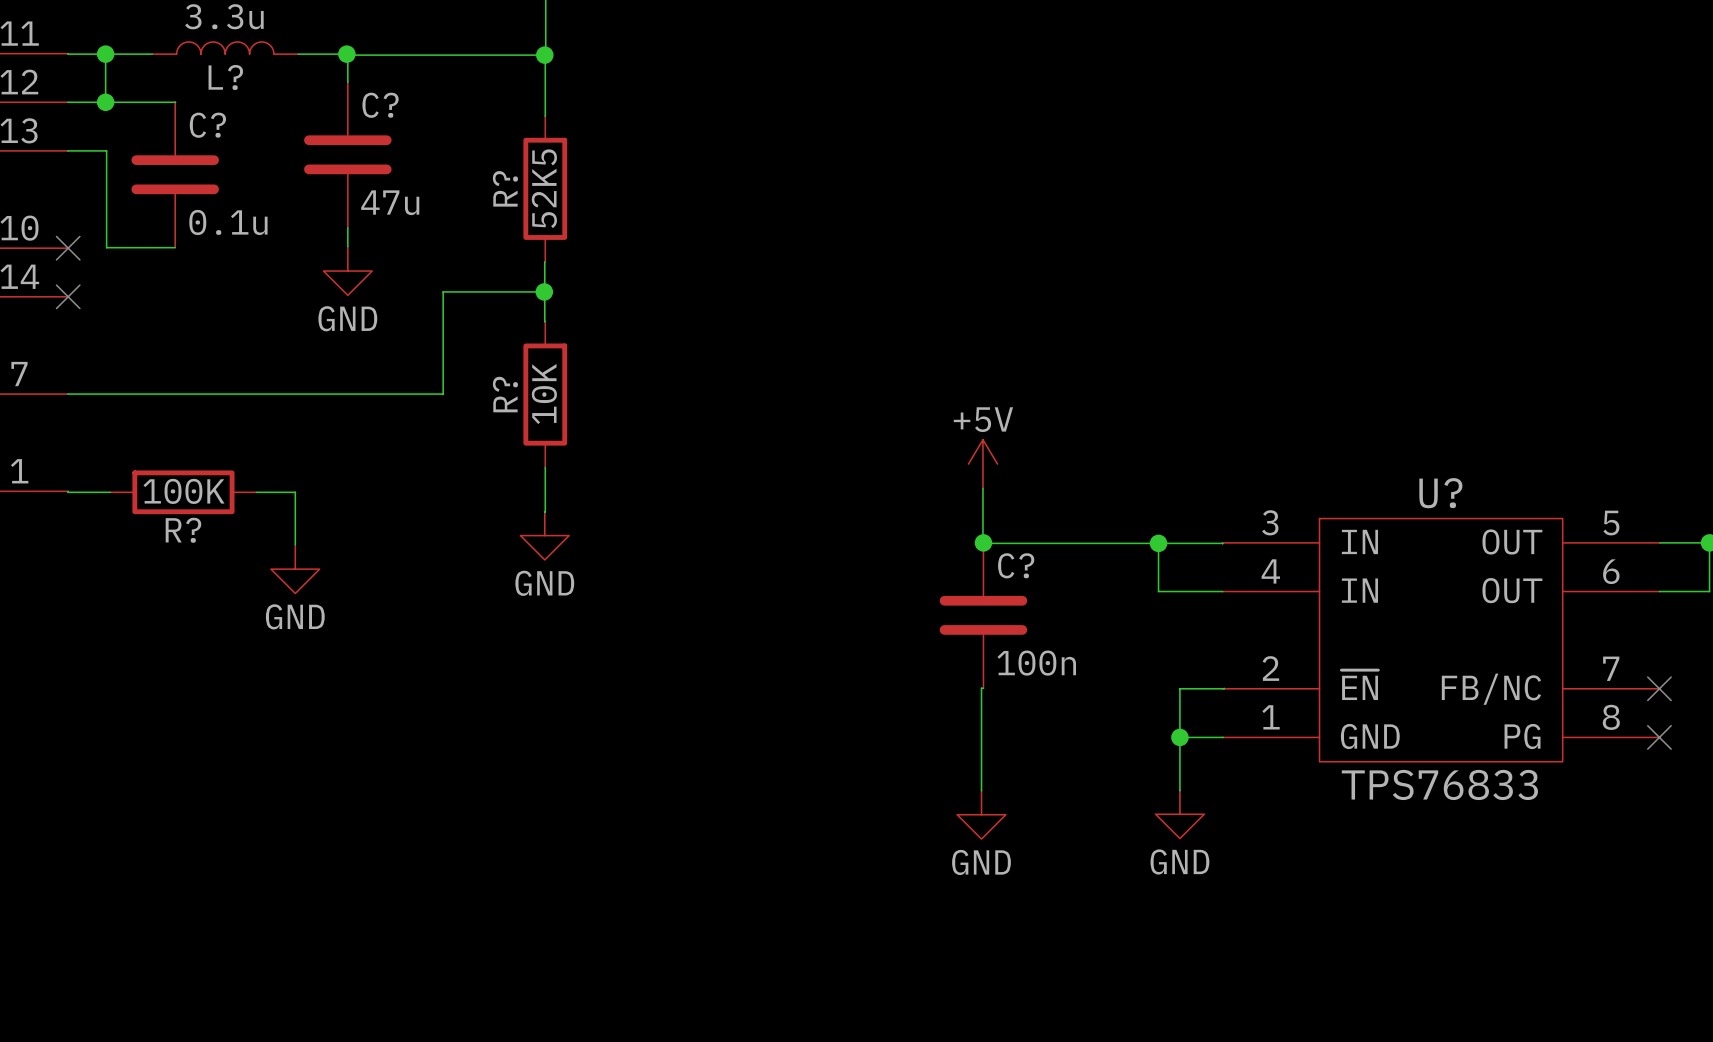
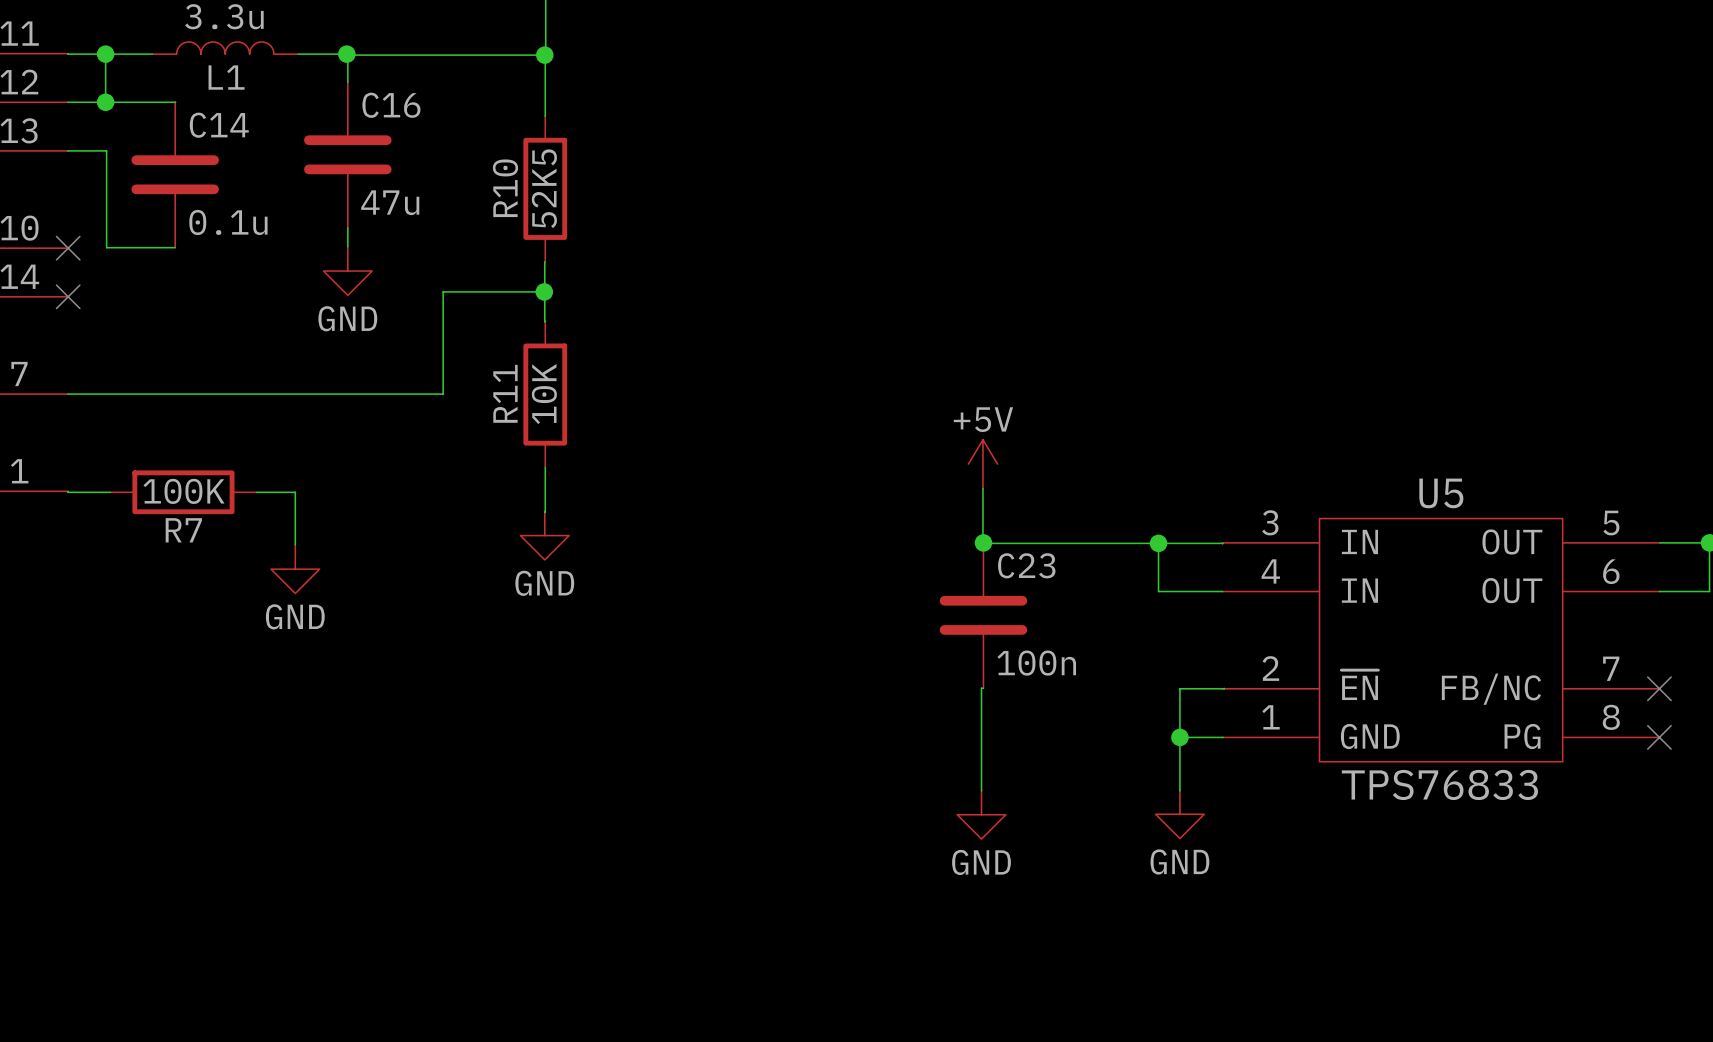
L? name: L? (225, 77) -> L1 (226, 77)
C? name: C? (380, 105) -> C16 (391, 105)
C? name: C? (207, 125) -> C14 (219, 125)
R? name: R? (505, 188) -> R10 (505, 188)
R? name: R? (505, 394) -> R11 (505, 393)
U? name: U? (1440, 493) -> U5 (1441, 493)
R? name: R? (183, 530) -> R7 (183, 530)
C? name: C? (1016, 565) -> C23 (1026, 565)

